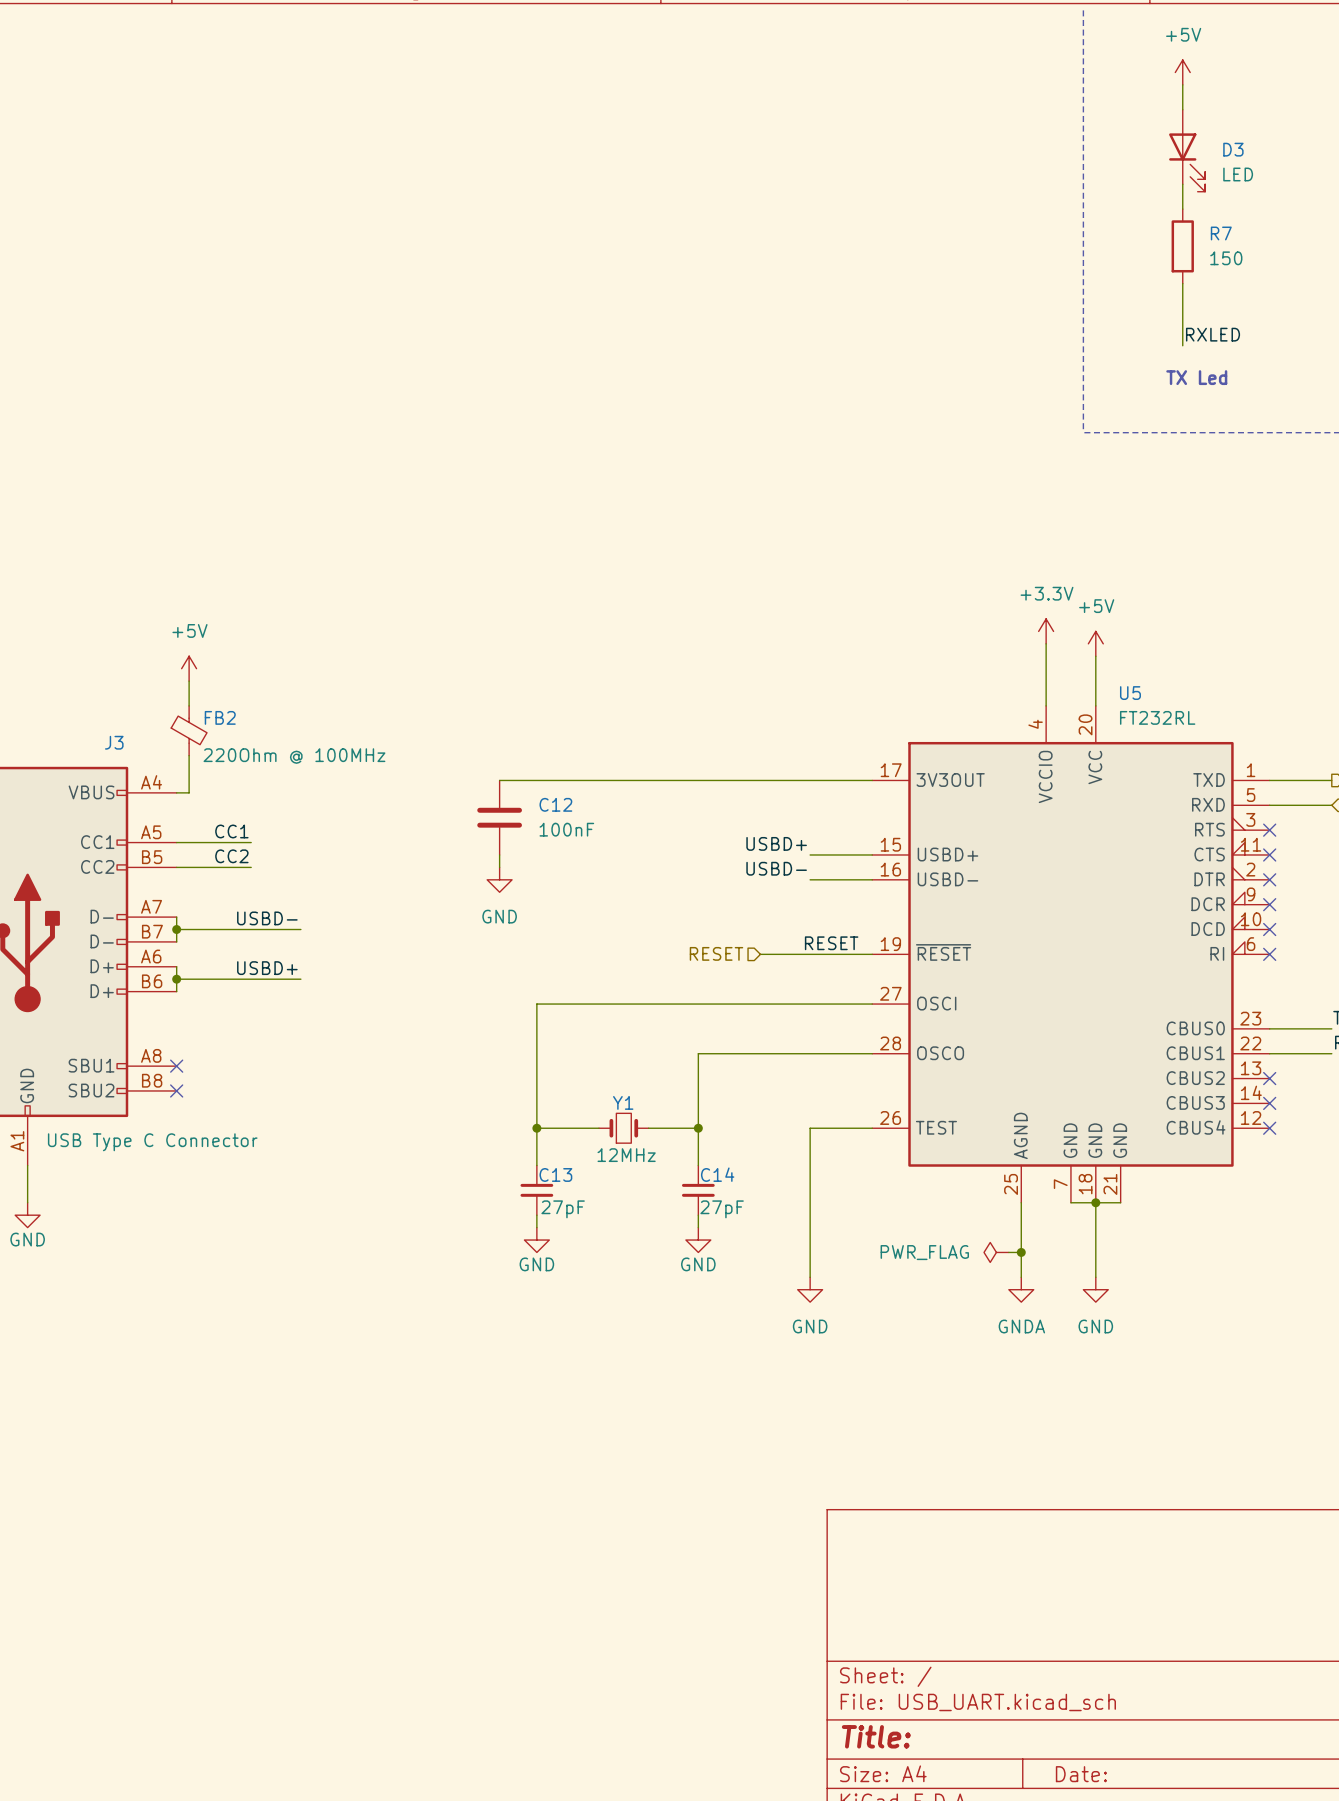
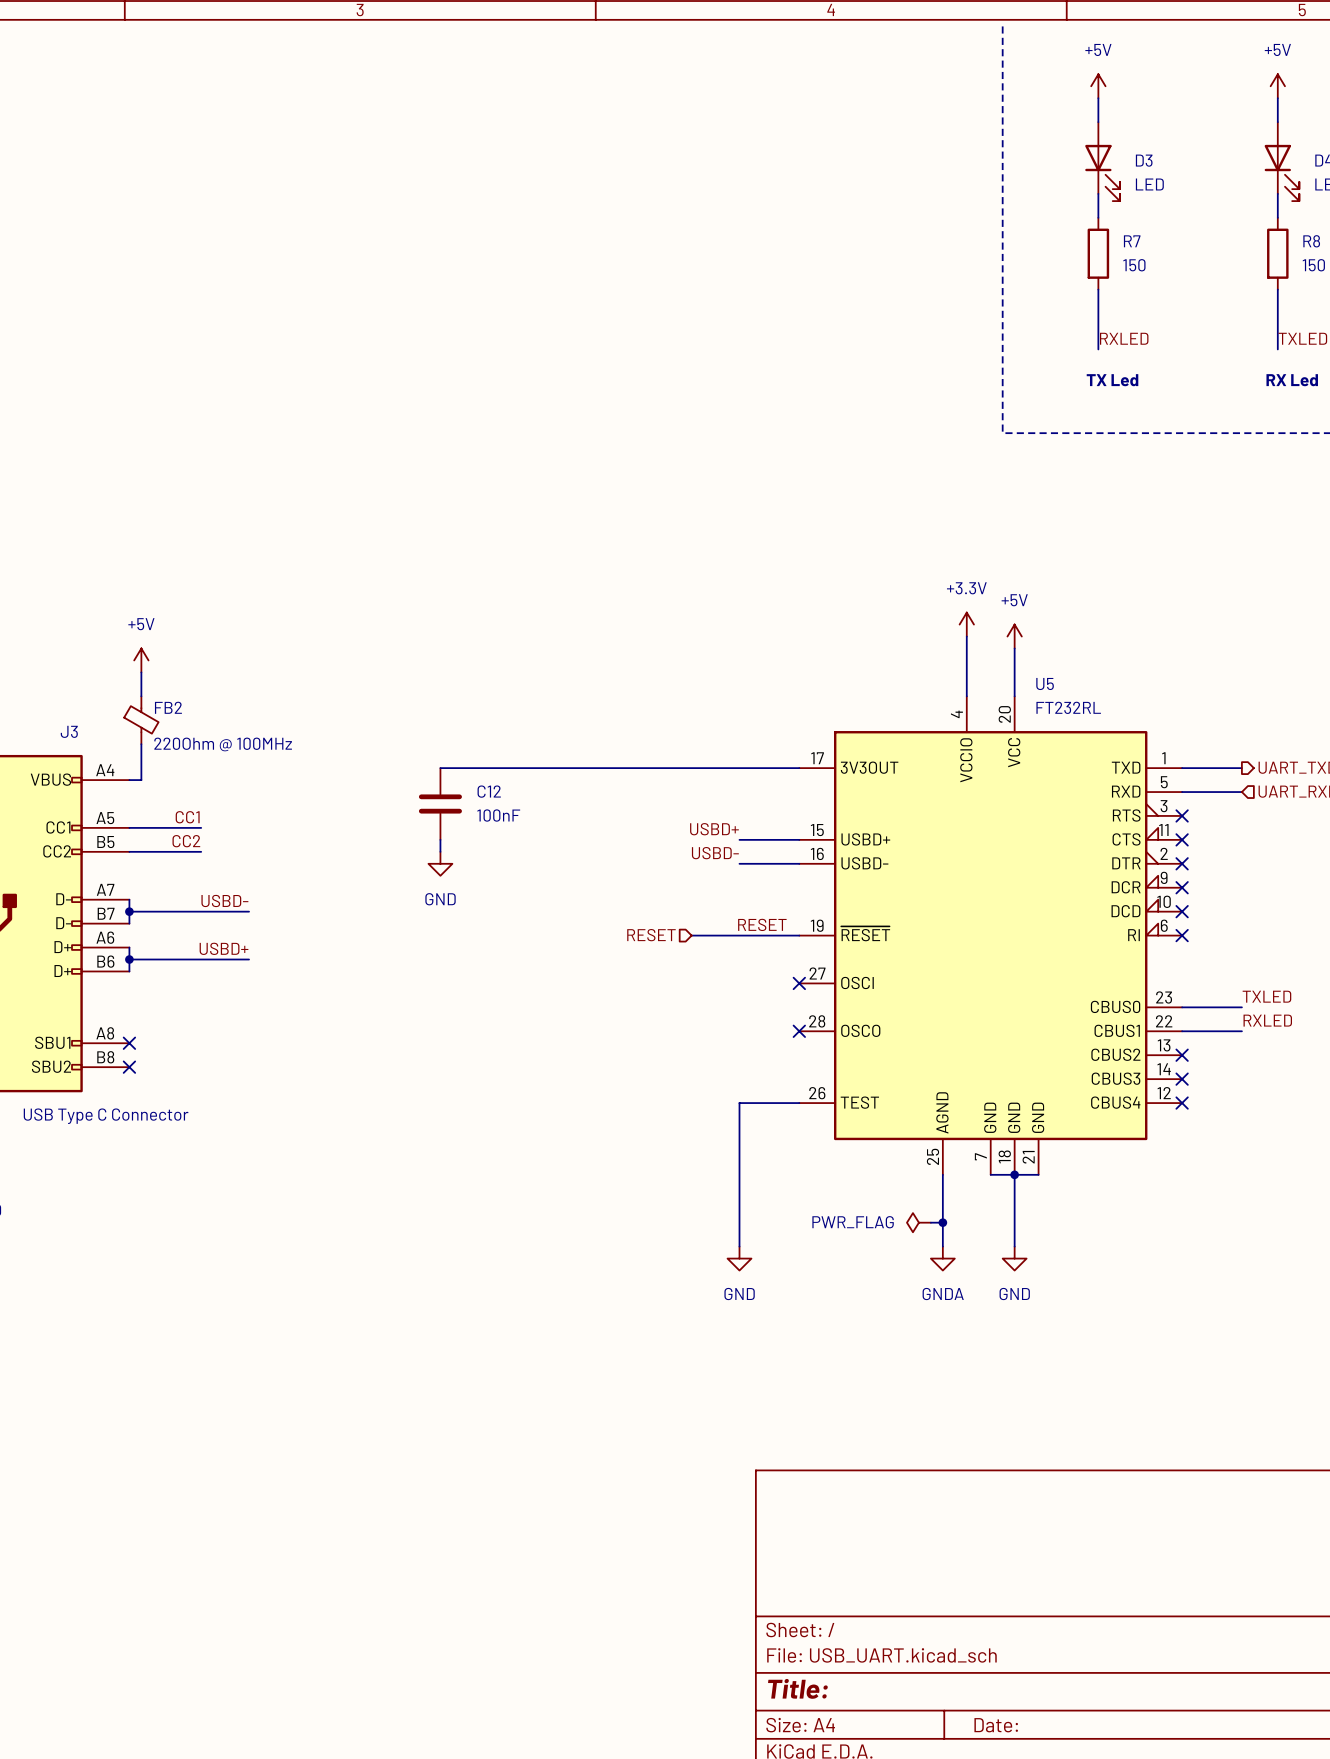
wire: (872, 1004) (536, 1004) (536, 1165) -> none
no-connect mark: none -> (799, 983)
wire: (872, 1053) (698, 1053) (698, 1165) -> none
no-connect mark: none -> (799, 1031)
wire: (536, 1128) (598, 1128) -> none
junction: (536, 1128) -> none
Y1: 12MHz (623, 1128) -> none
wire: (648, 1128) (698, 1128) -> none
junction: (698, 1128) -> none
C13: 27pF (536, 1190) -> none
C14: 27pF (698, 1190) -> none
wire: (536, 1215) (536, 1227) -> none
wire: (698, 1215) (698, 1227) -> none
power symbol: GND (536, 1240) -> none
power symbol: GND (698, 1240) -> none

